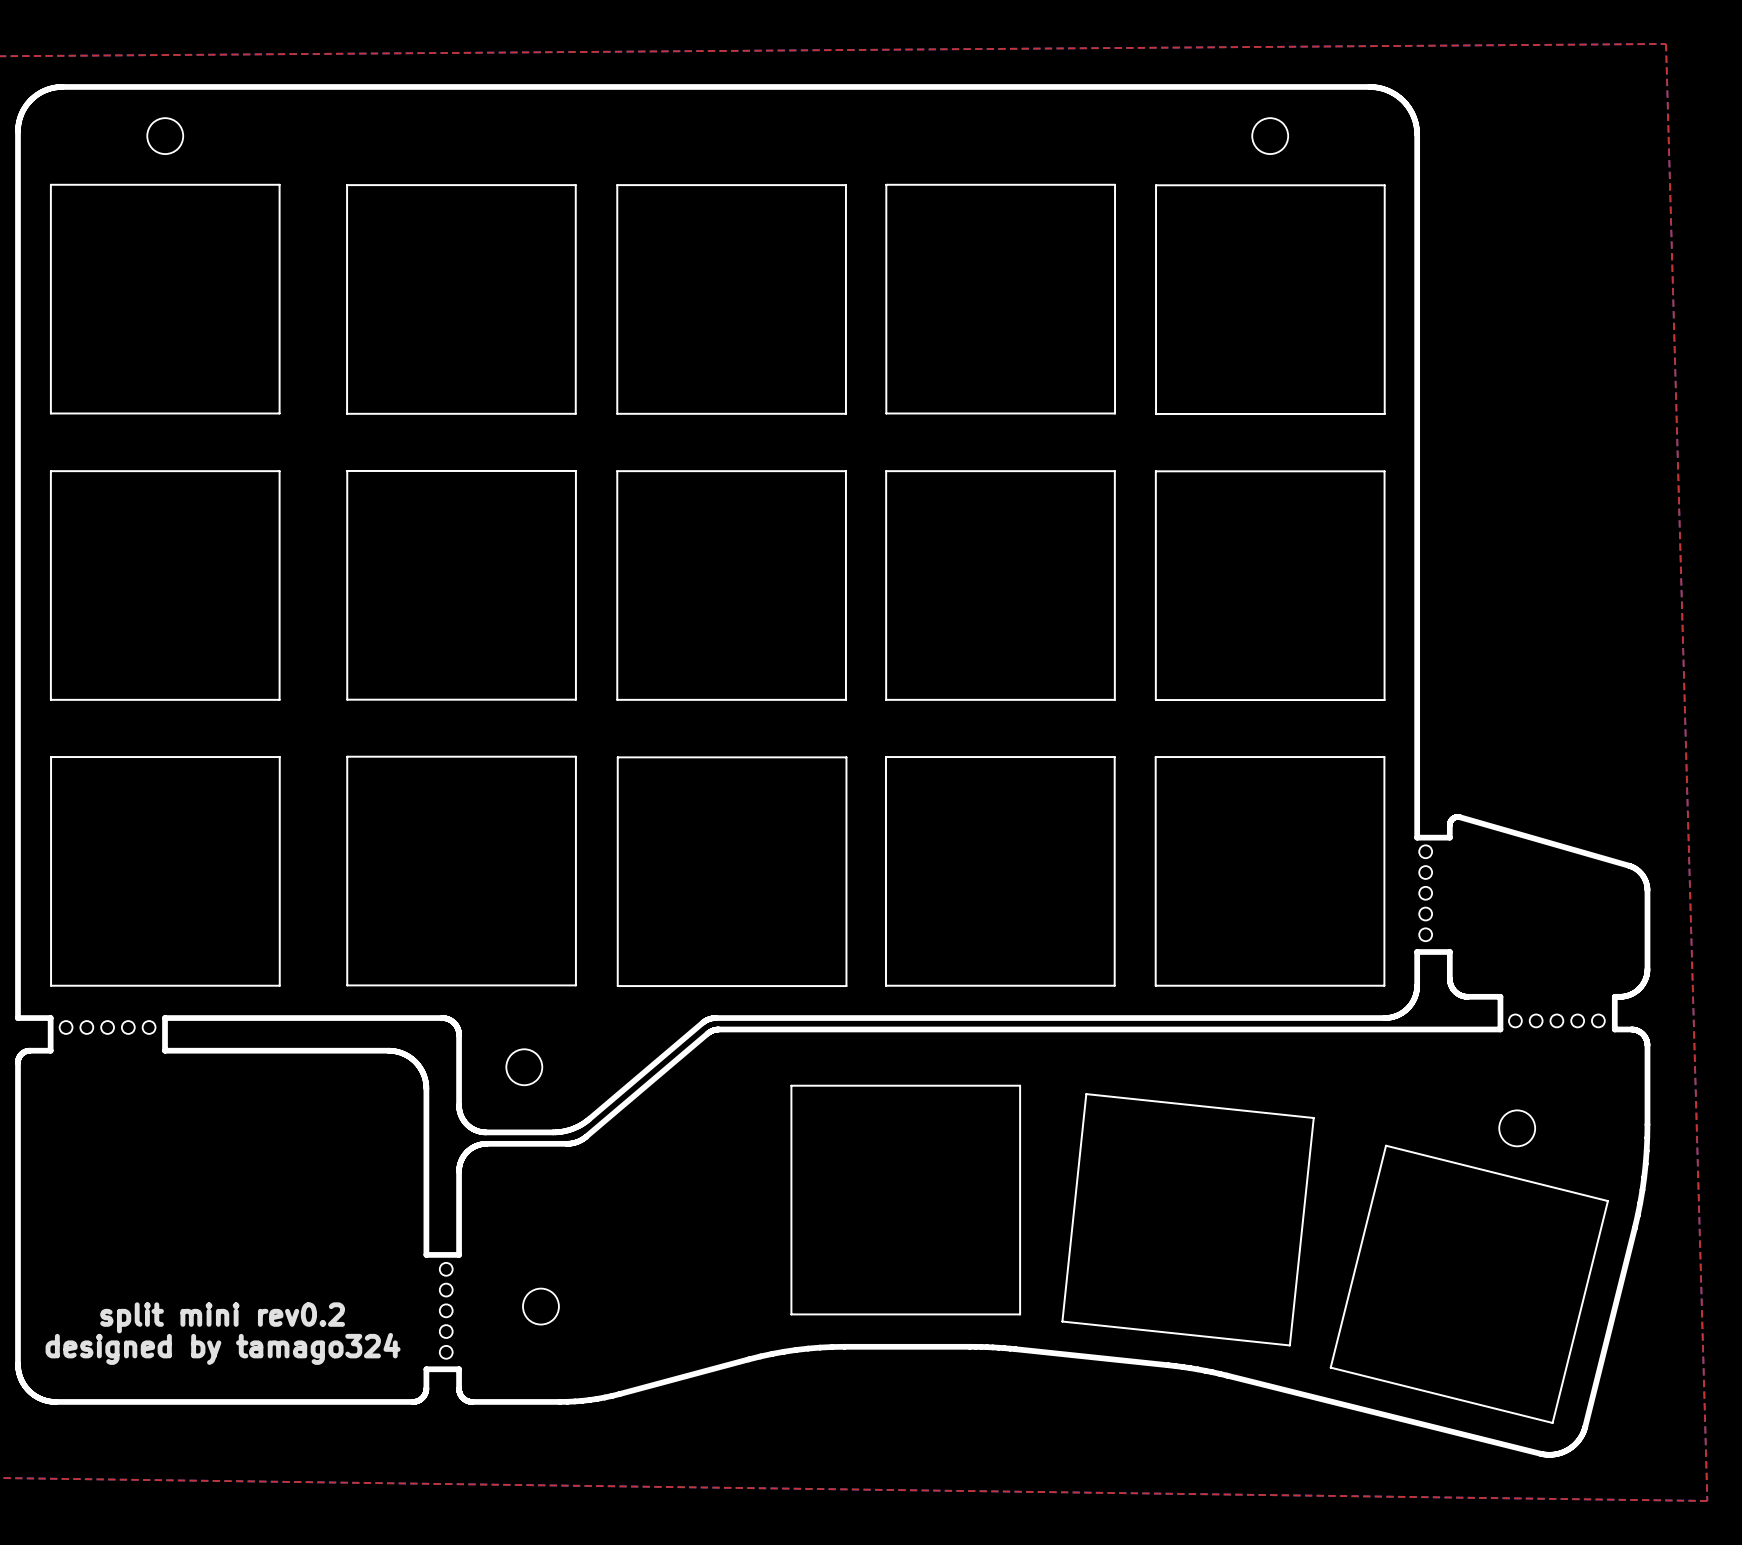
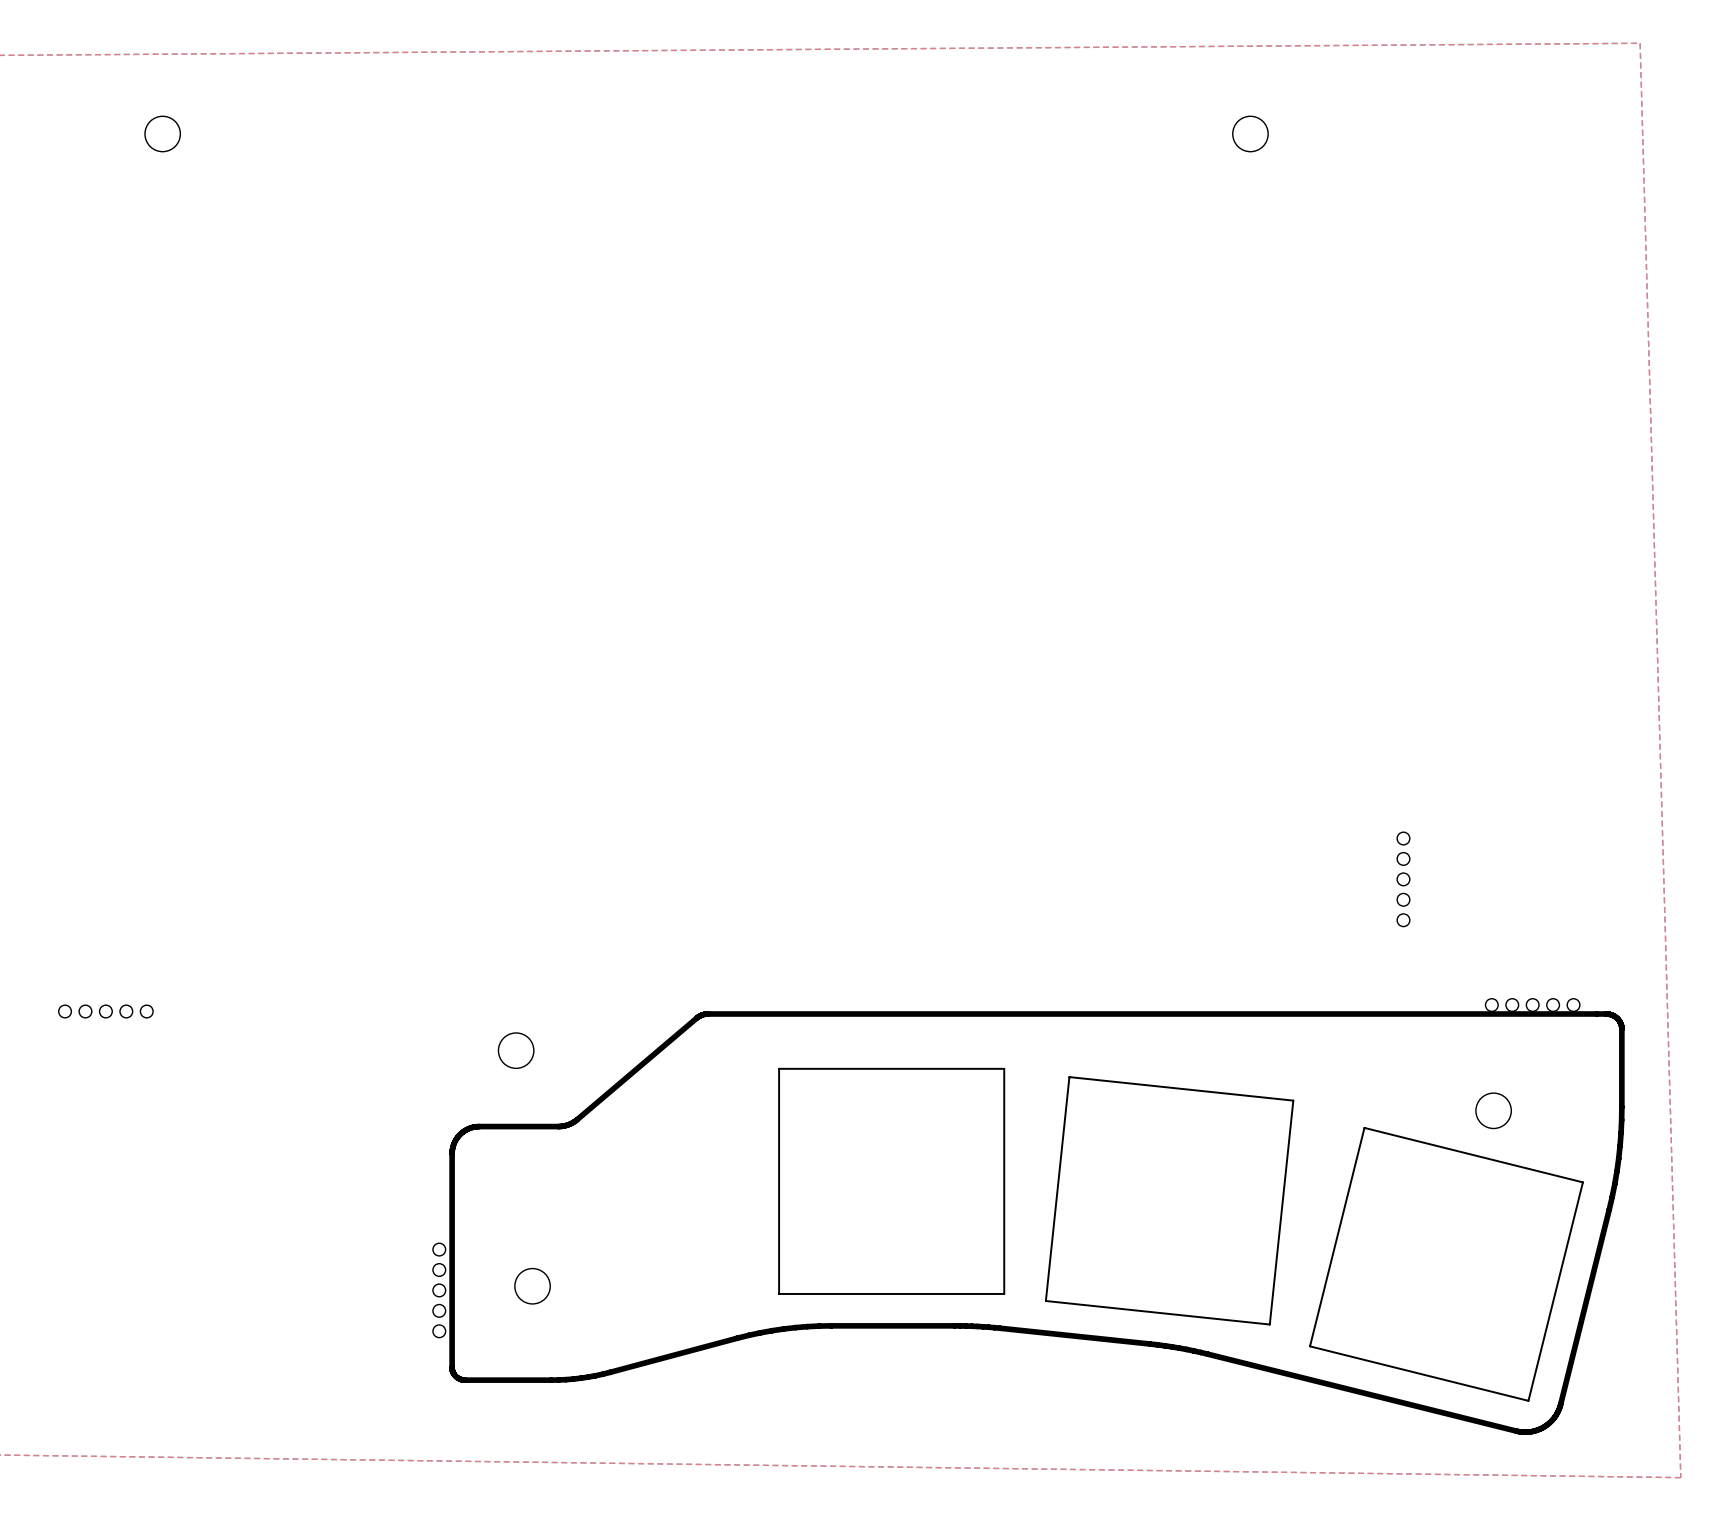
drawing: [49, 183, 281, 415] -> none
drawing: [885, 183, 1117, 415] -> none
drawing: [346, 184, 577, 415] -> none
drawing: [616, 184, 847, 415] -> none
drawing: [1155, 184, 1386, 415] -> none
drawing: [49, 470, 281, 701] -> none
drawing: [346, 470, 577, 701] -> none
drawing: [616, 470, 847, 701] -> none
drawing: [885, 470, 1116, 701] -> none
drawing: [1154, 470, 1386, 702] -> none
drawing: [346, 755, 577, 987] -> none
drawing: [50, 756, 281, 987] -> none
drawing: [616, 756, 848, 988] -> none
drawing: [885, 756, 1116, 987] -> none
drawing: [1154, 756, 1386, 987] -> none
board edge: (1417, 952) (1417, 987) (1414, 998) (1404, 1011) (1387, 1017) (711, 1018) (702, 1022) (587, 1120) (574, 1128) (558, 1132) (483, 1132) (474, 1129) (466, 1124) (461, 1116) (459, 1108) (458, 1031) (454, 1022) (445, 1018) (165, 1018) (165, 1050) (390, 1050) (409, 1057) (421, 1069) (426, 1084) (426, 1254) (459, 1254) (459, 1168) (461, 1159) (468, 1151) (483, 1143) (568, 1143) (579, 1141) (713, 1030) (1500, 1029) (1500, 996) (1466, 996) (1459, 994) (1453, 989) (1450, 982) (1449, 952) (1417, 952) -> none
board edge: (1646, 1039) (1636, 1030) (1614, 1029) (1614, 996) (1626, 995) (1636, 991) (1643, 983) (1647, 973) (1647, 888) (1644, 878) (1638, 870) (1628, 865) (1459, 817) (1453, 818) (1450, 821) (1449, 837) (1417, 837) (1417, 132) (1410, 109) (1394, 93) (1381, 88) (1369, 86) (62, 86) (49, 88) (35, 95) (26, 104) (19, 118) (17, 131) (17, 1018) (50, 1018) (50, 1050) (26, 1051) (20, 1055) (18, 1061) (17, 1364) (19, 1375) (24, 1385) (31, 1393) (42, 1399) (53, 1401) (414, 1401) (421, 1398) (425, 1392) (426, 1369) (459, 1369) (459, 1391) -> (1620, 1022) (1614, 1016) (1606, 1014) (702, 1014) (571, 1123) (559, 1126) (475, 1126) (465, 1130) (456, 1138) (452, 1153) (452, 1370)
text: split mini rev0.2 (222, 1317) -> none
text: designed by tamago324 (223, 1348) -> none

